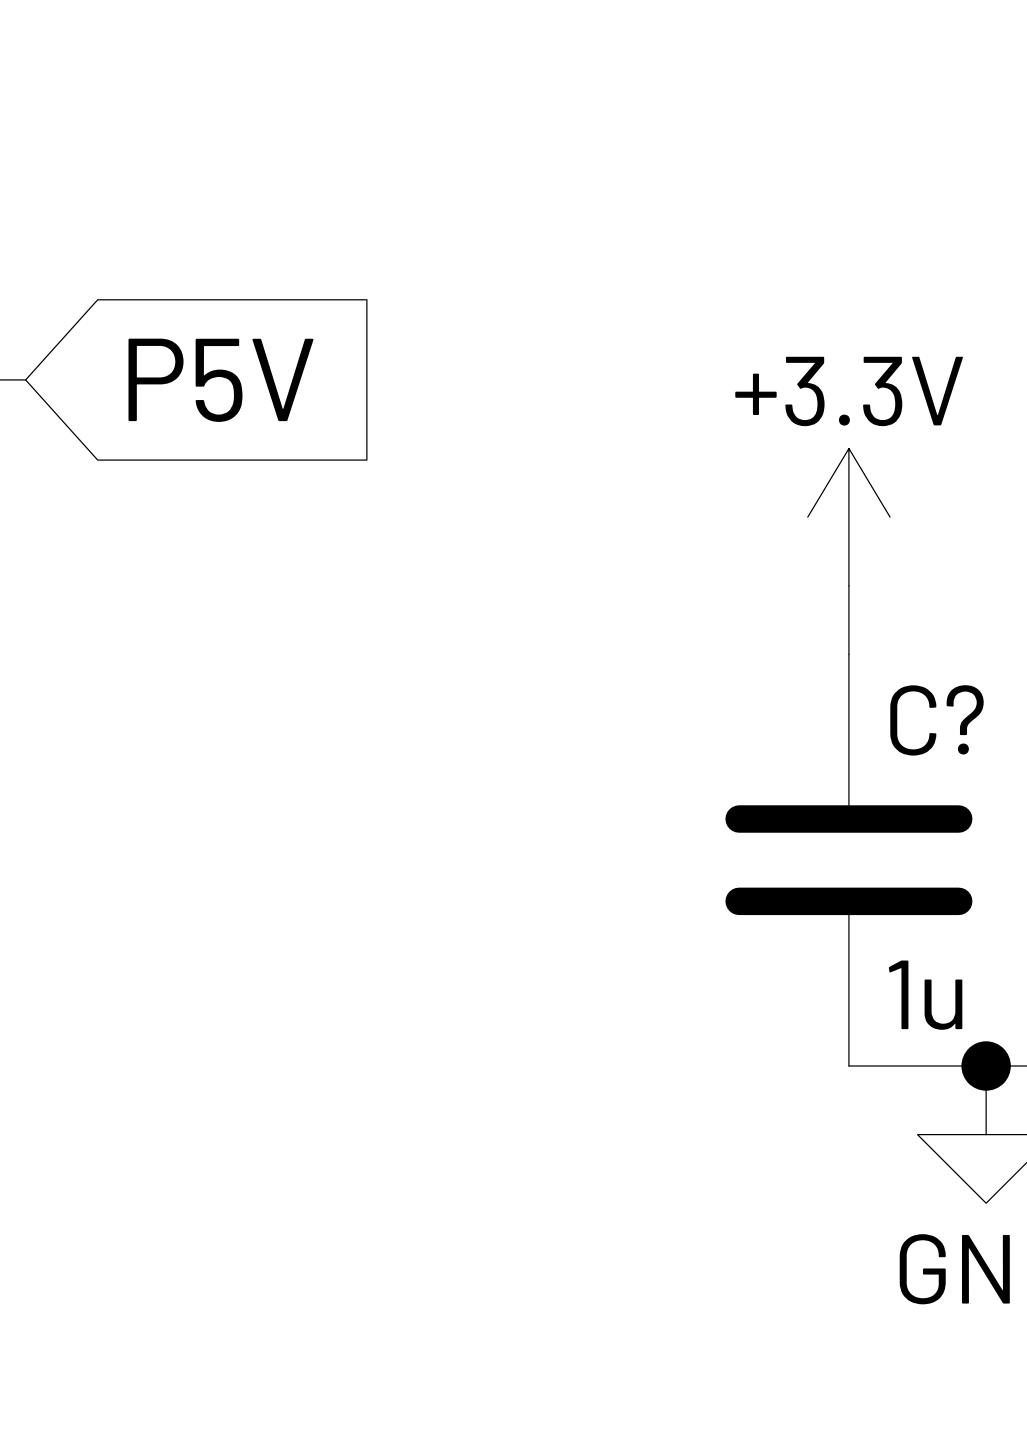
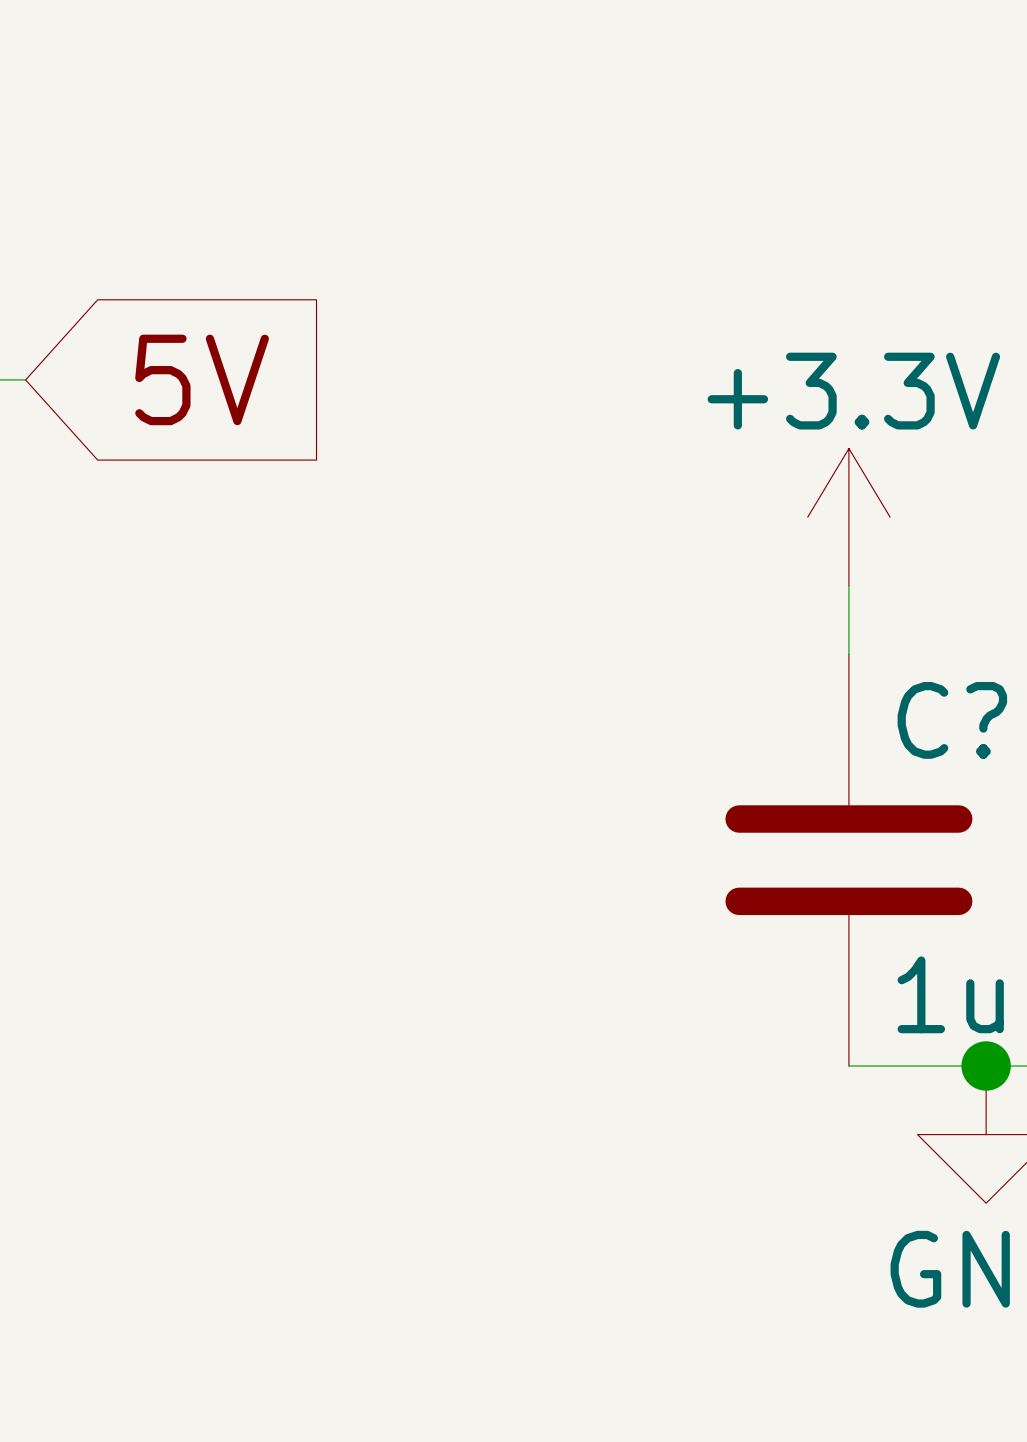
global label: P5V (221, 380) -> 5V (202, 379)

